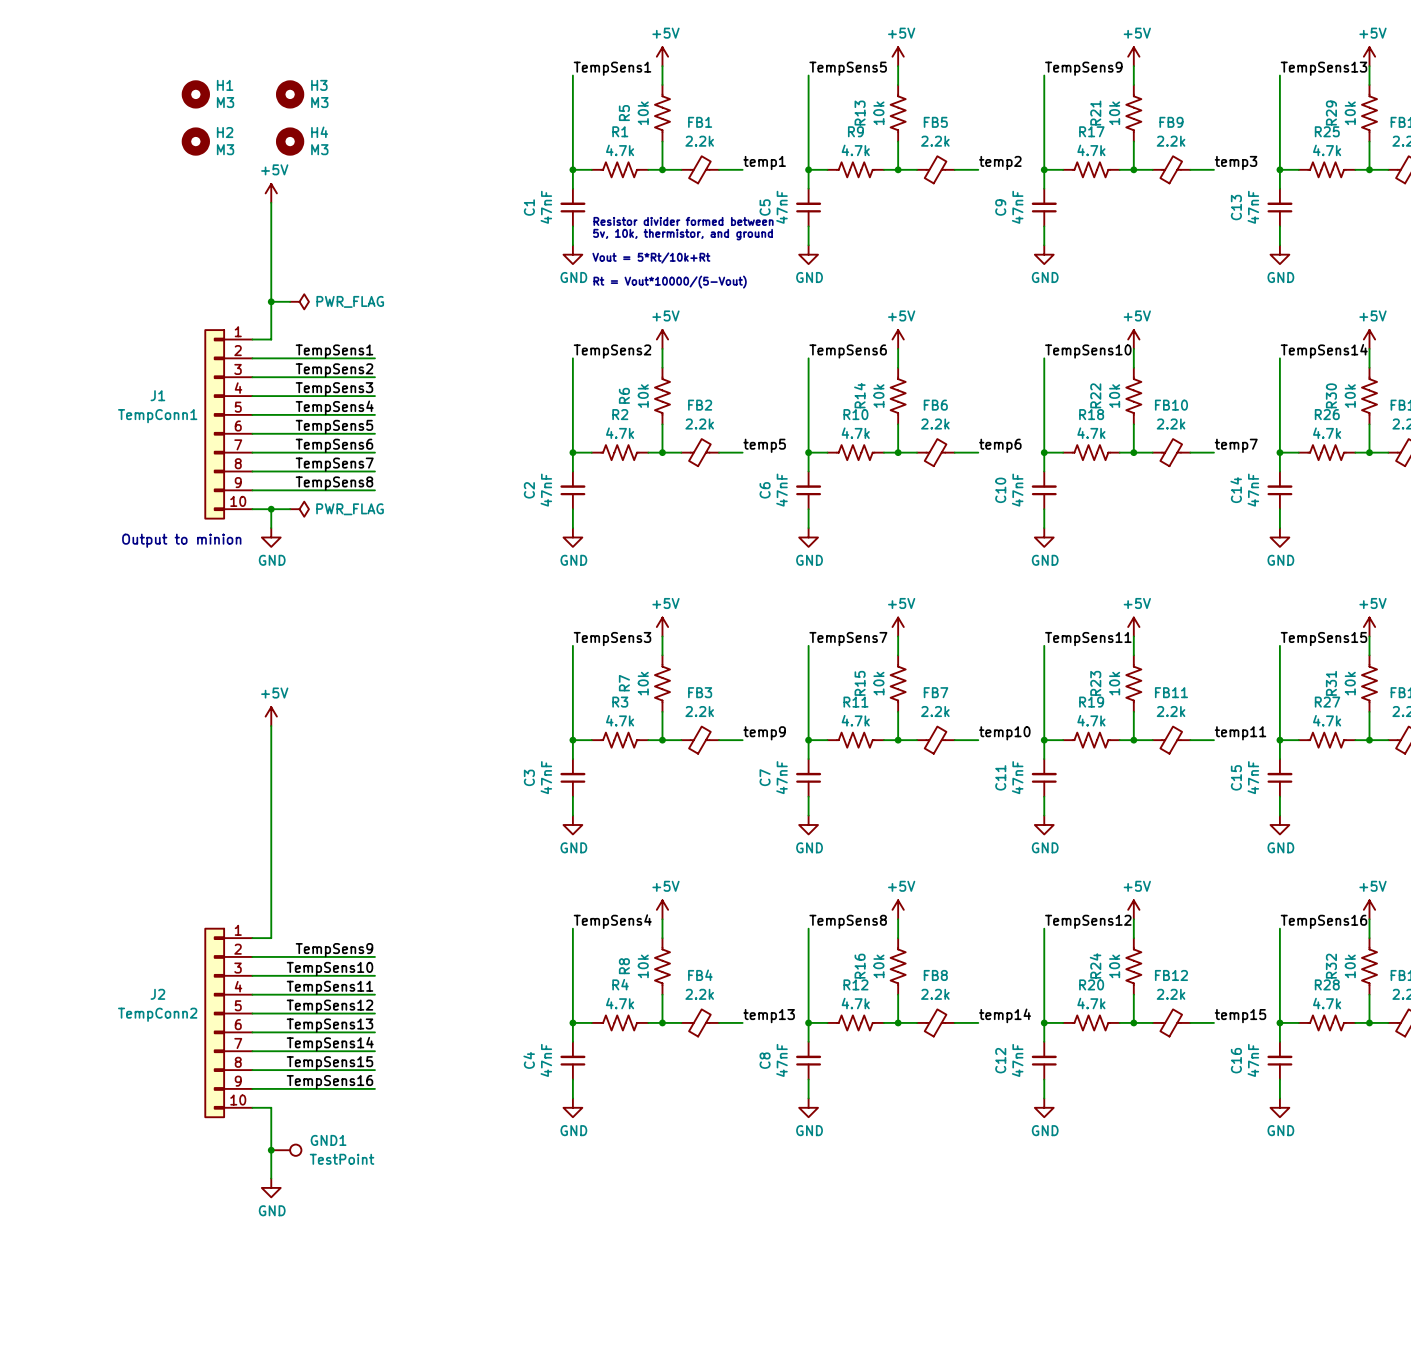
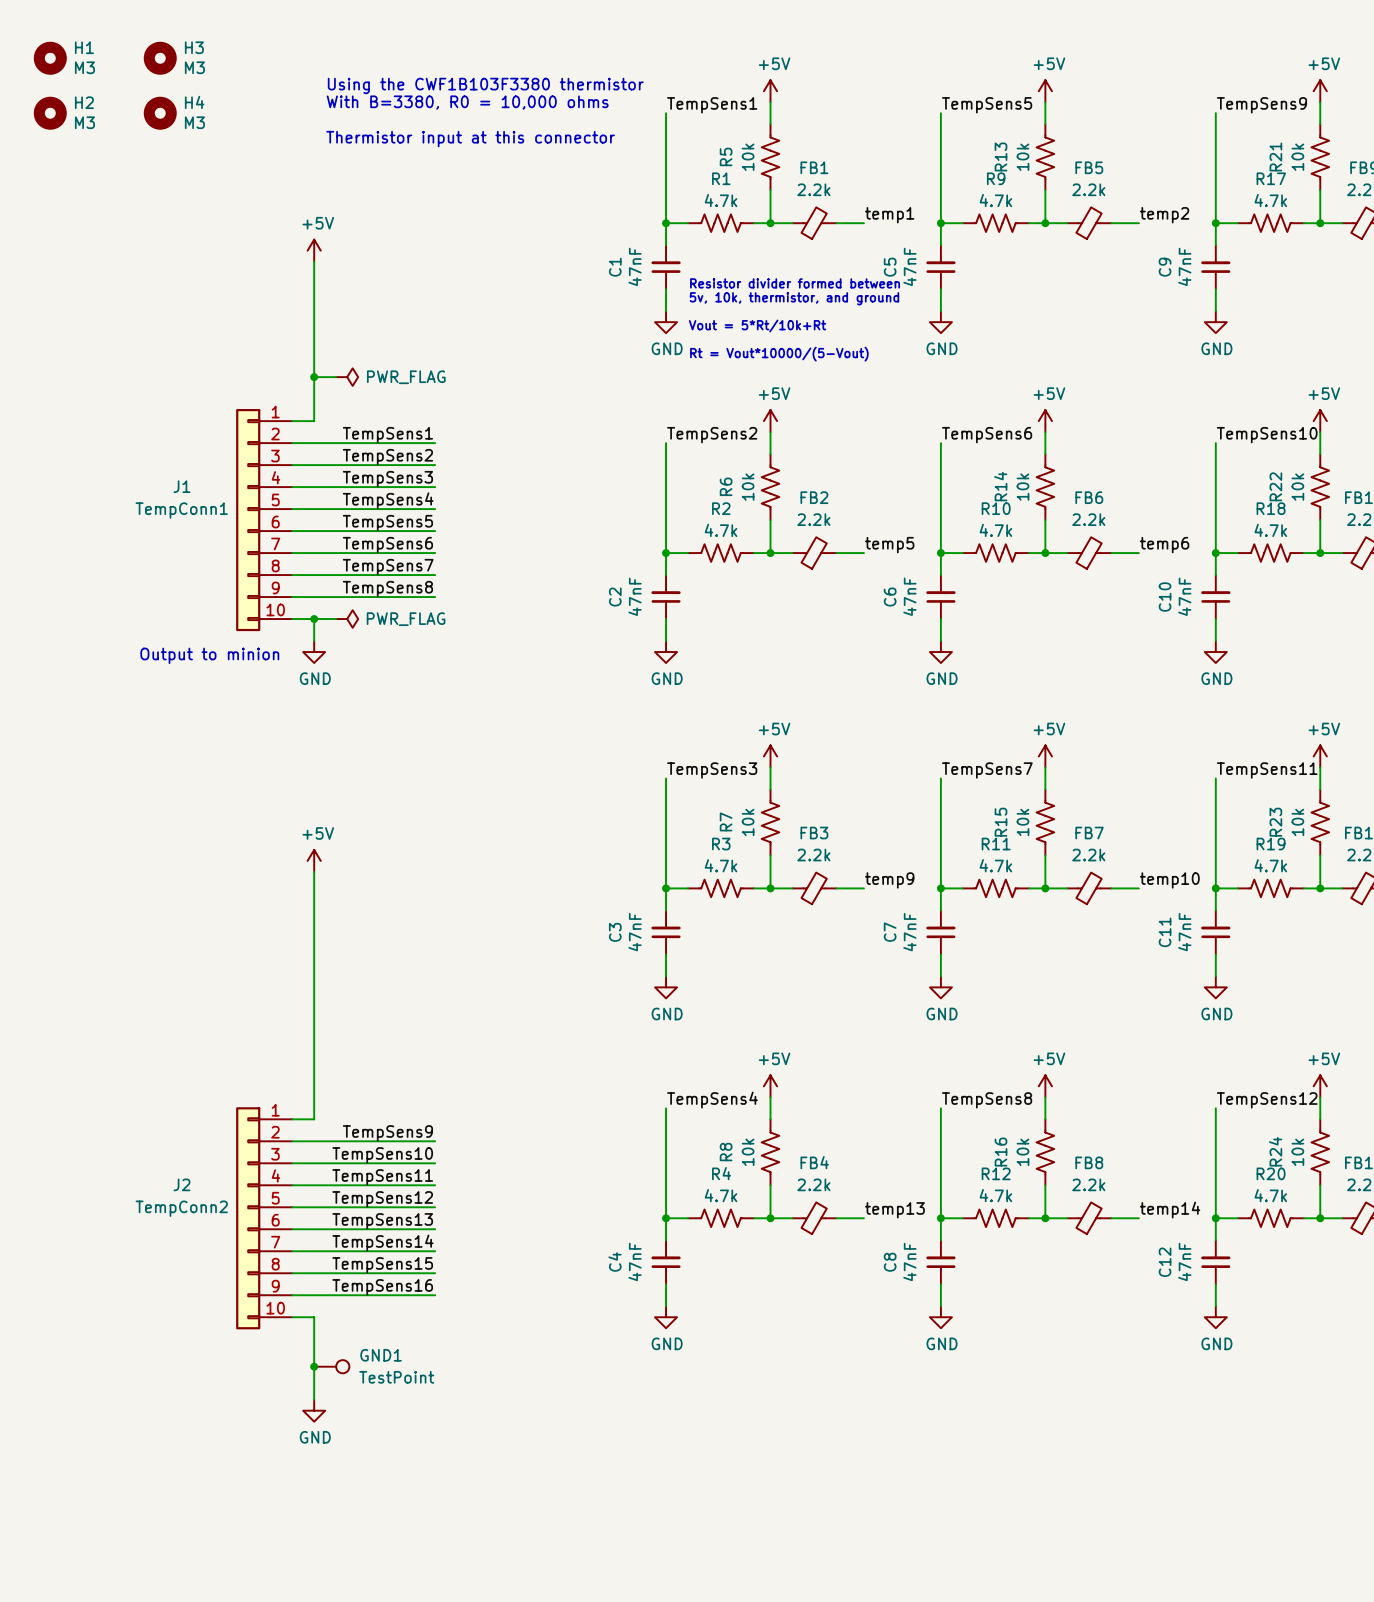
text: none -> Using the CWF1B103F3380 thermistor (485, 85)
text: none -> With B=3380, R0 = 10,000 ohms (467, 102)
H1 position: (195, 94) -> (50, 58)
H3 position: (290, 94) -> (160, 58)
text: none -> Thermistor input at this connector (470, 139)
H2 position: (195, 141) -> (50, 113)
H4 position: (290, 141) -> (160, 113)

